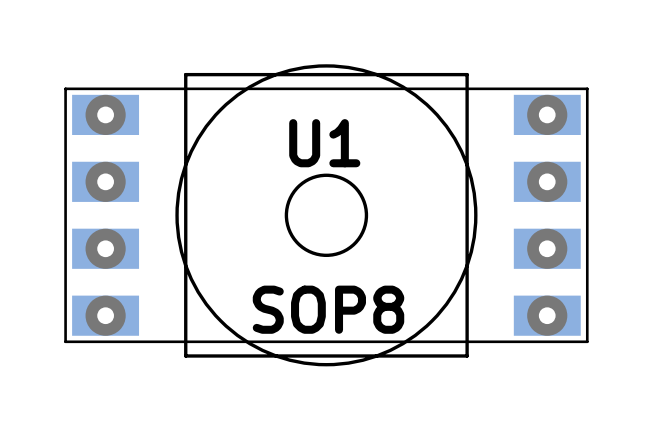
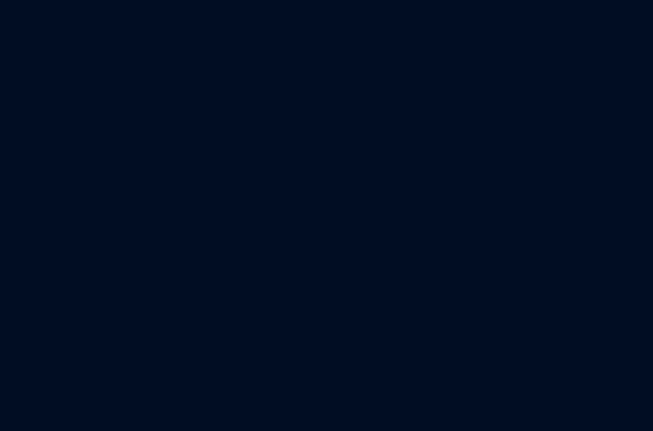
board edge: (587, 88) (587, 341) (65, 341) (65, 88) (587, 88) -> none
via: (105, 114) -> none
via: (547, 114) -> none
via: (105, 181) -> none
via: (547, 181) -> none
U1: SOP8 (326, 215) -> none
via: (105, 248) -> none
via: (547, 248) -> none
via: (105, 315) -> none
via: (547, 315) -> none

